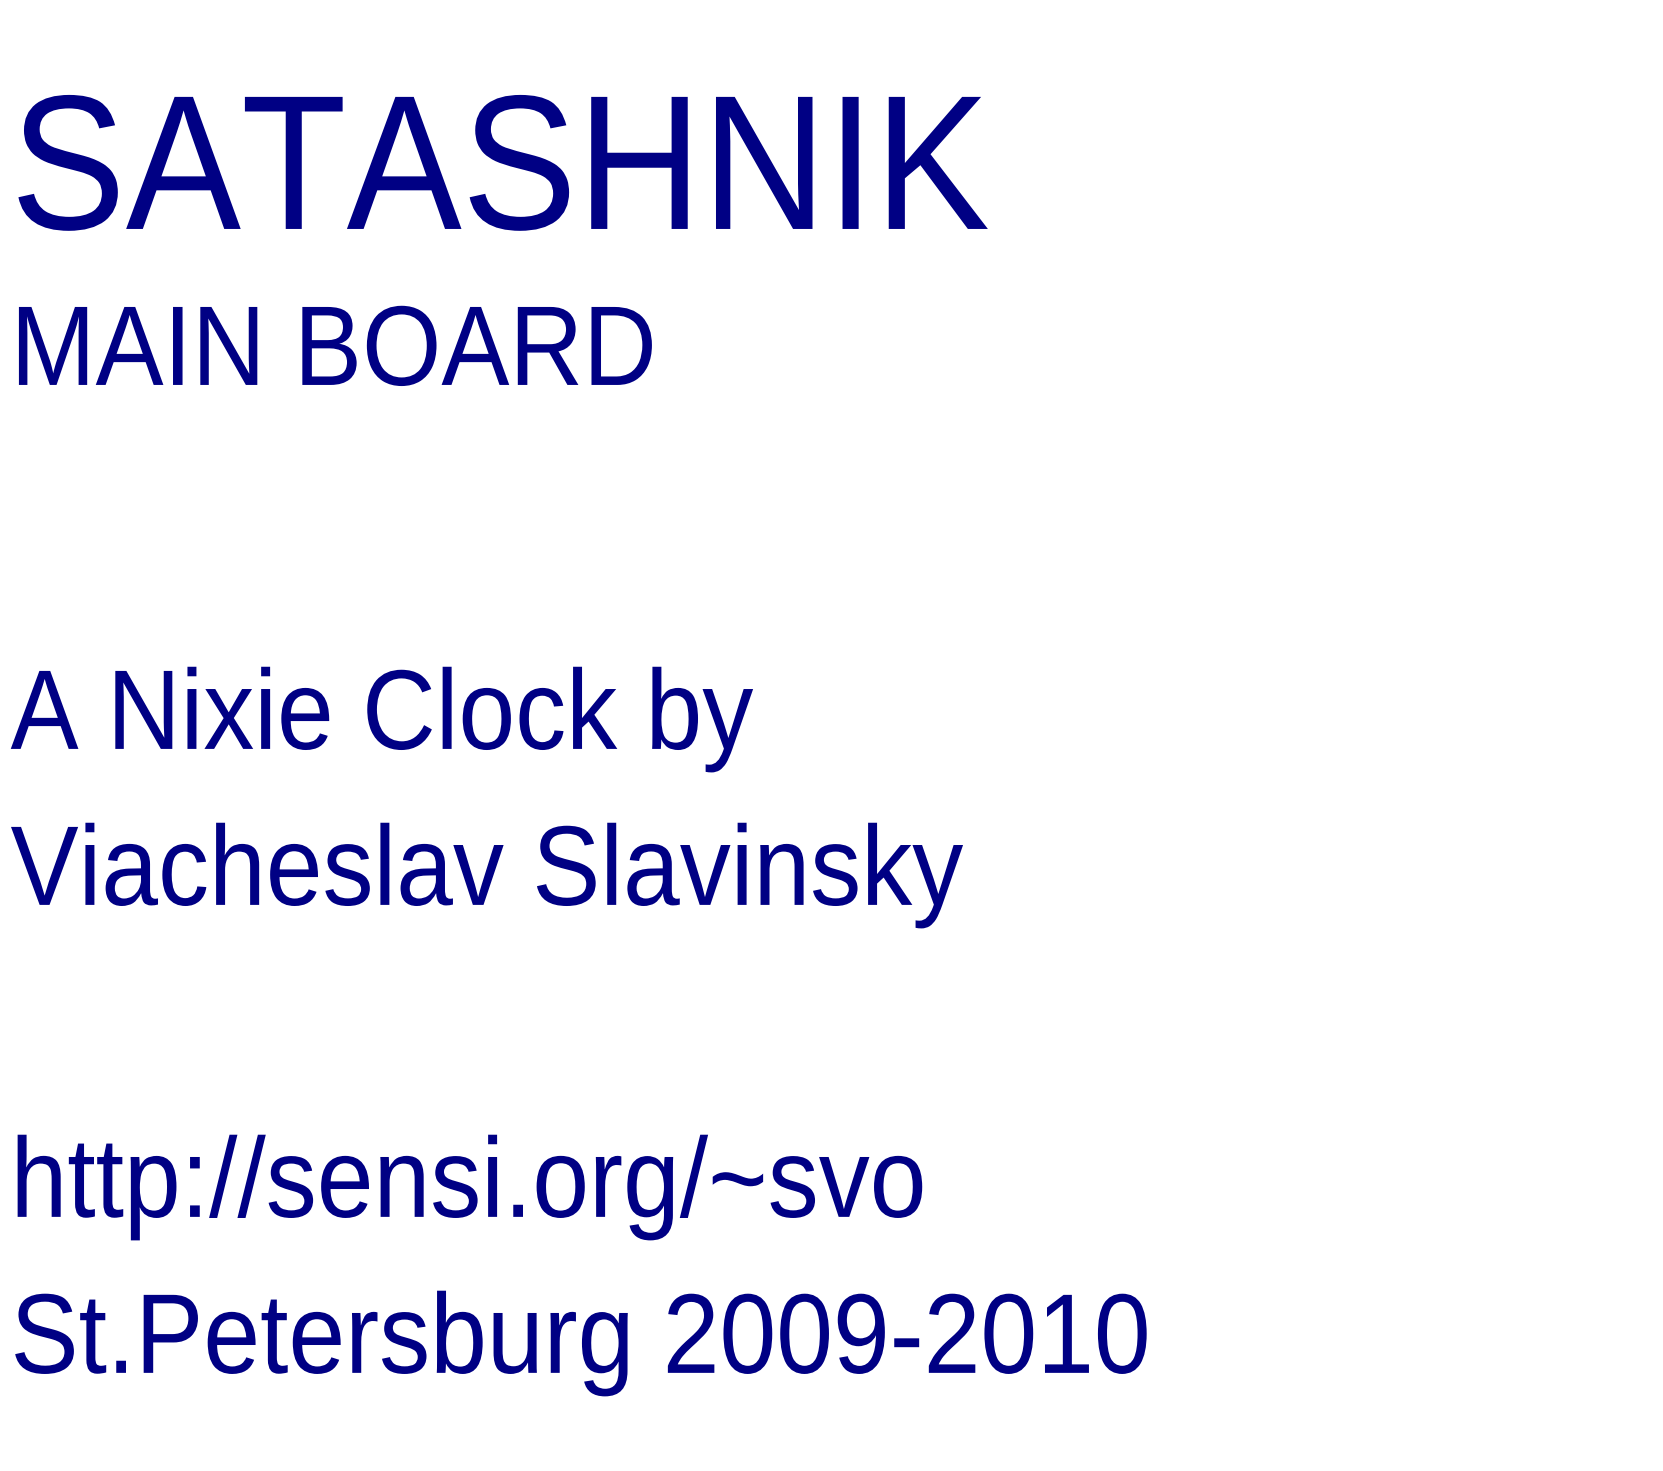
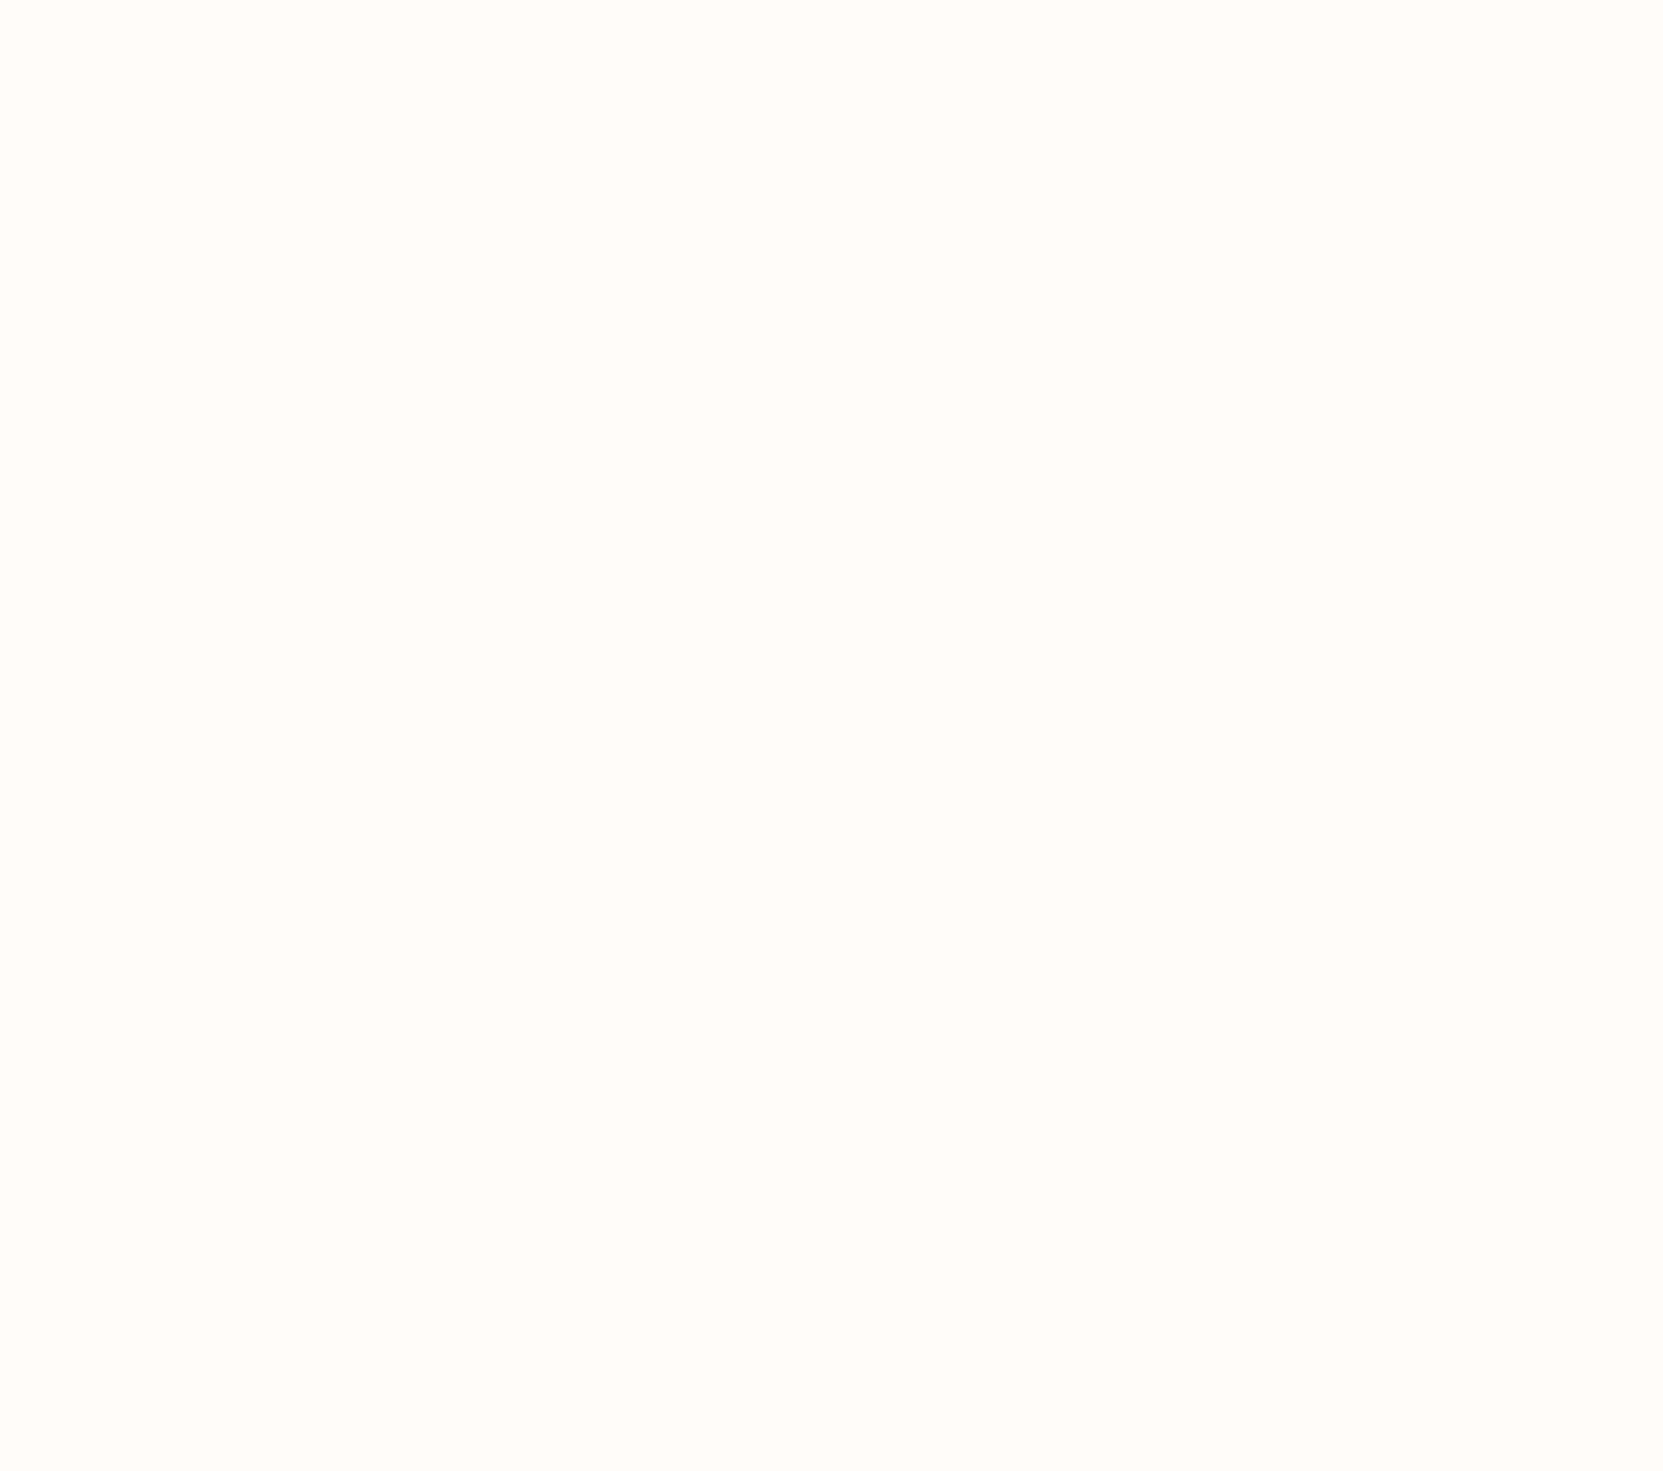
text: SATASHNIK (503, 162) -> none
text: MAIN BOARD (335, 345) -> none
text: A Nixie Clock by (381, 719) -> none
text: Viacheslav Slavinsky (487, 875) -> none
text: http://sensi.org/~svo (469, 1187) -> none
text: St.Petersburg 2009-2010 (580, 1343) -> none

